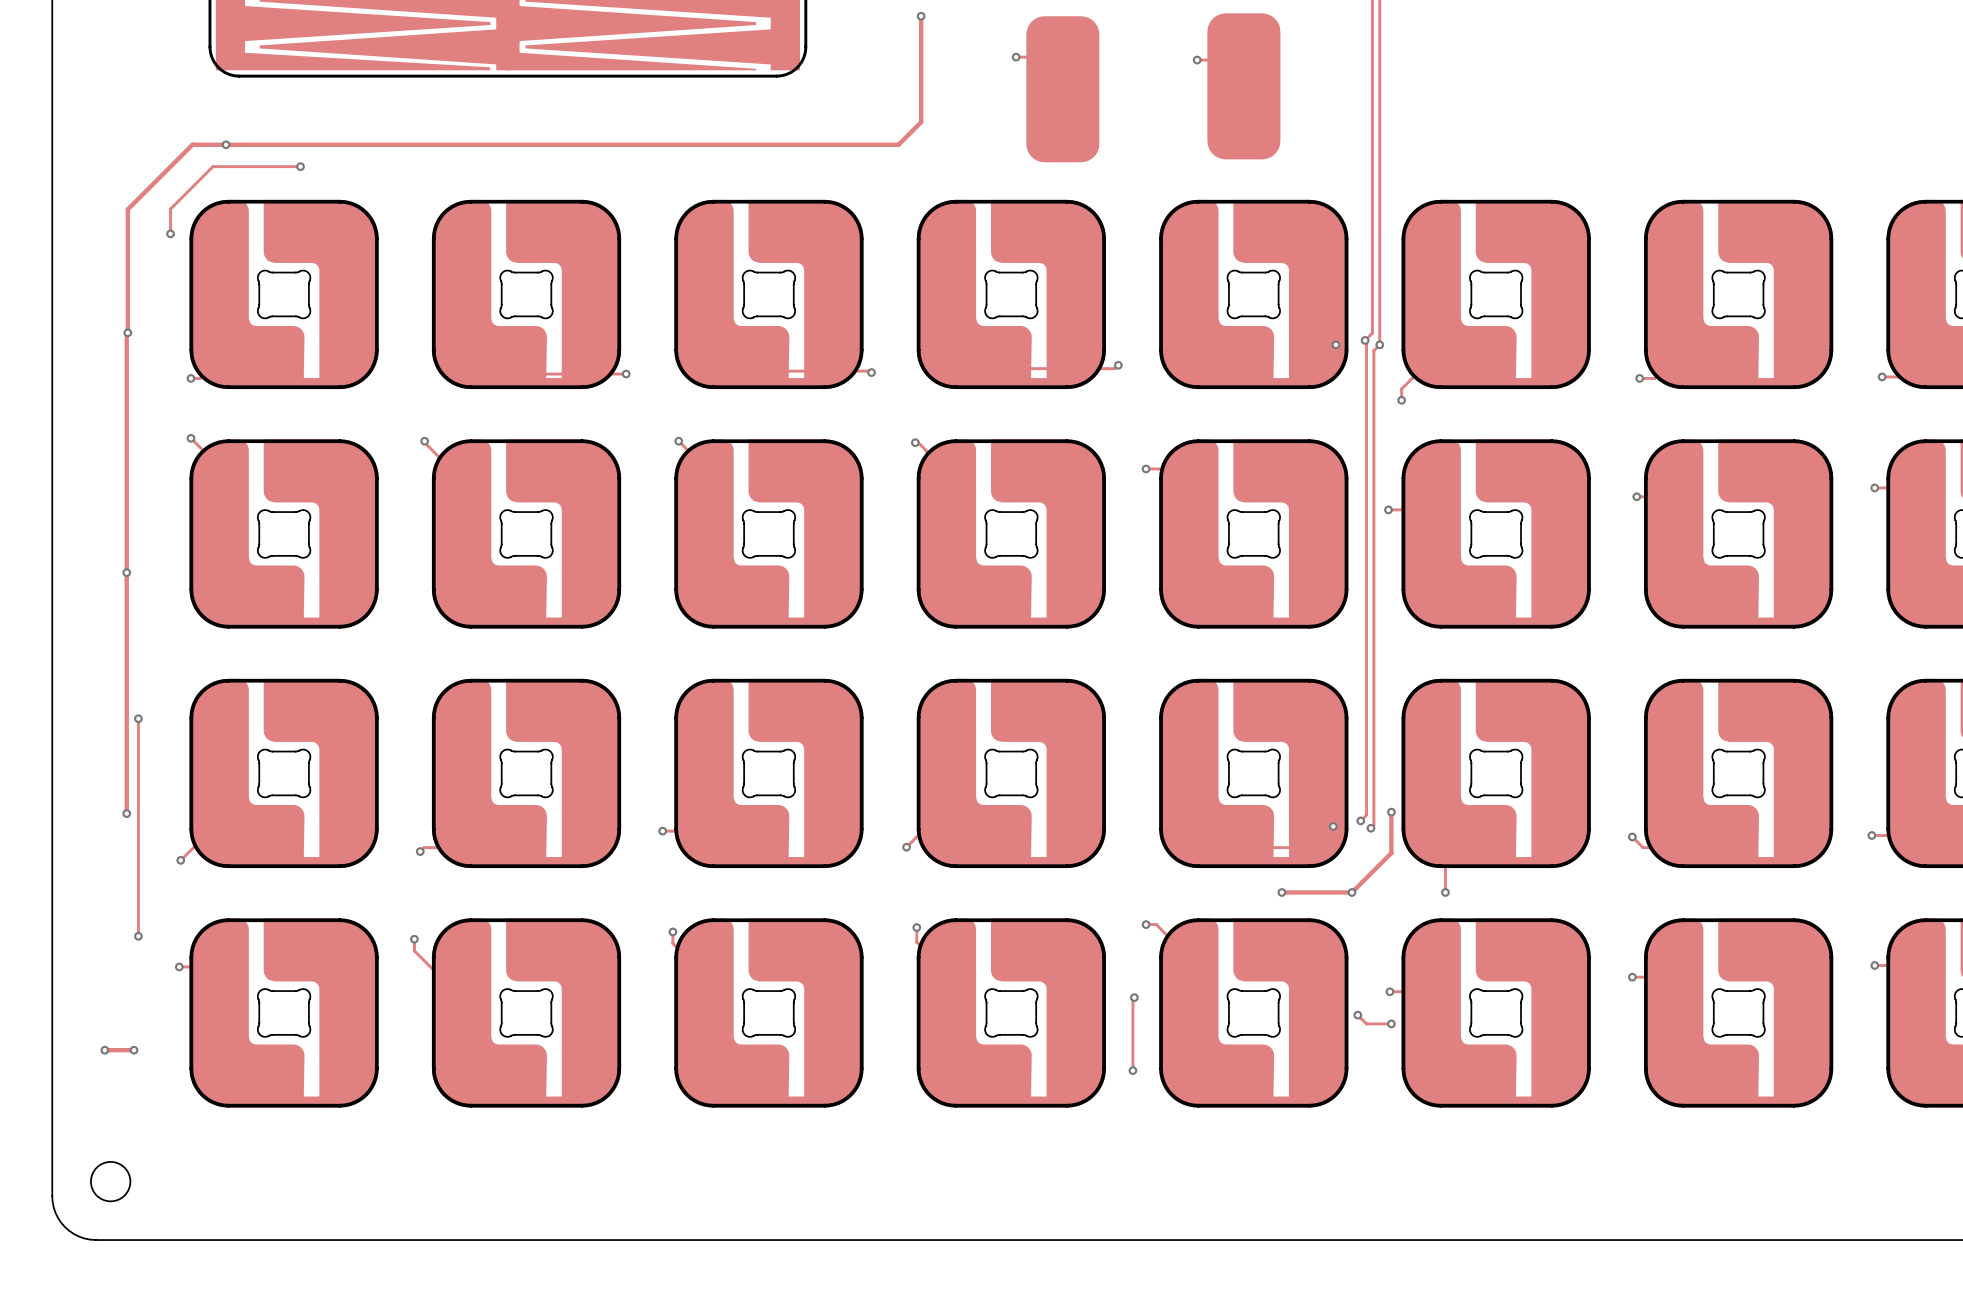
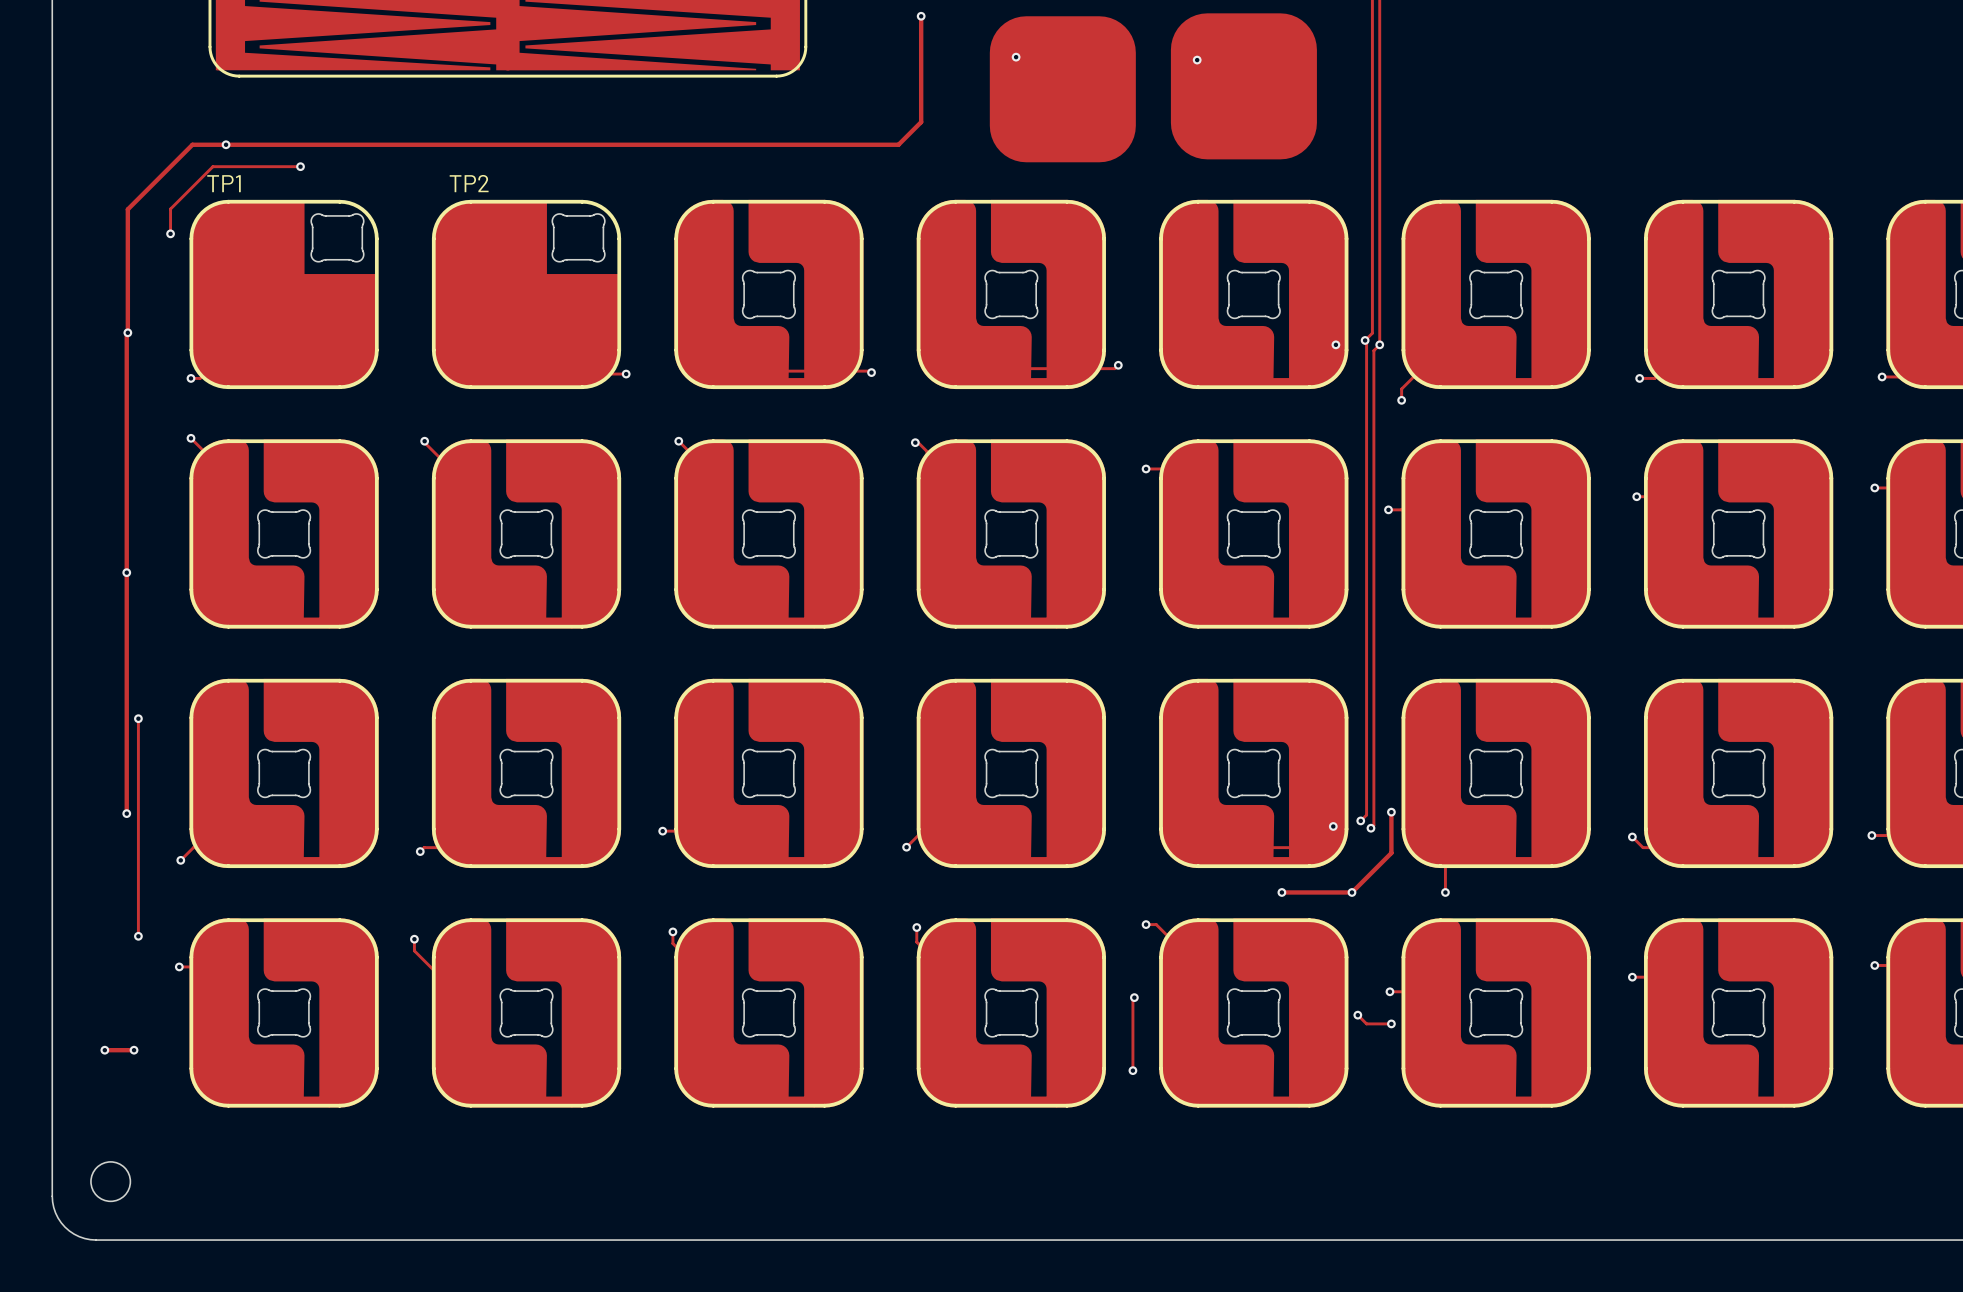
part footprint: [1207, 13, 1281, 160] -> [1170, 13, 1317, 160]
part footprint: [1026, 16, 1100, 163] -> [989, 16, 1136, 163]
part position: (284, 294) -> (337, 237)
part: (284, 294) -> none
TP1: none -> (284, 294)
part position: (526, 294) -> (578, 237)
part: (526, 294) -> none
TP2: none -> (526, 294)

